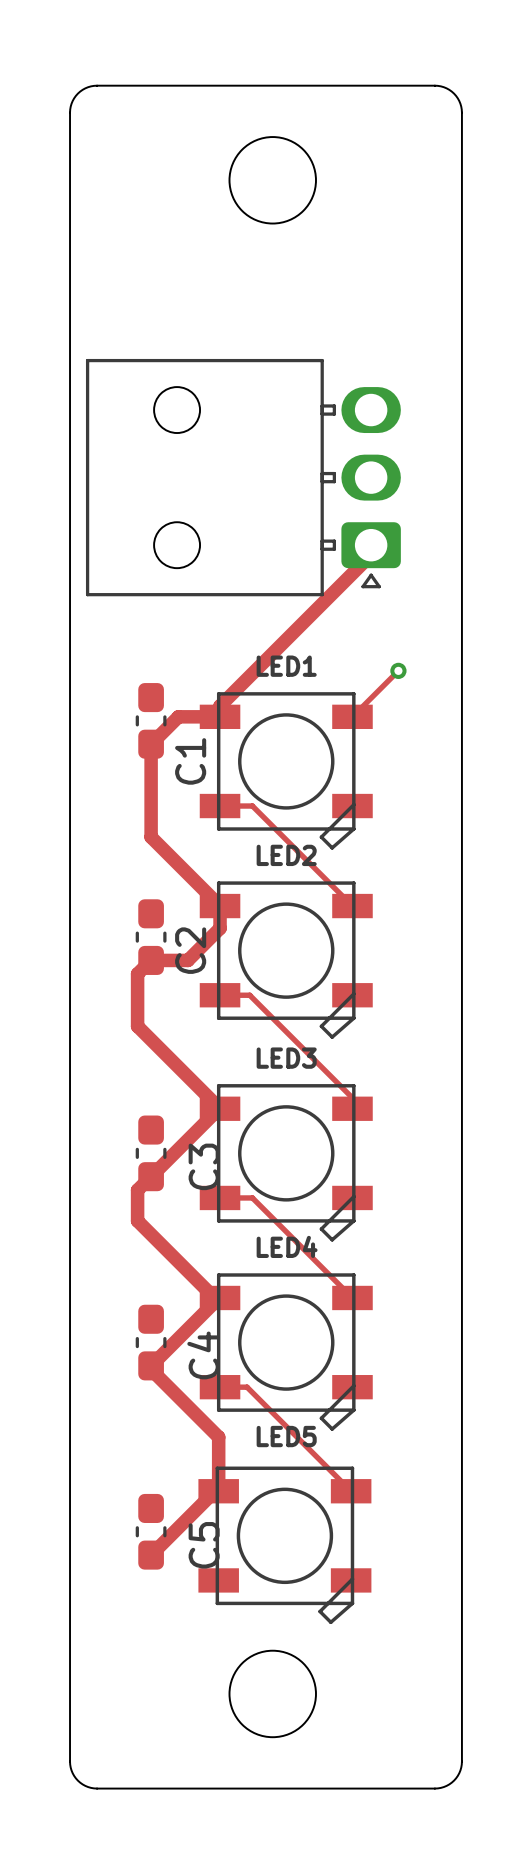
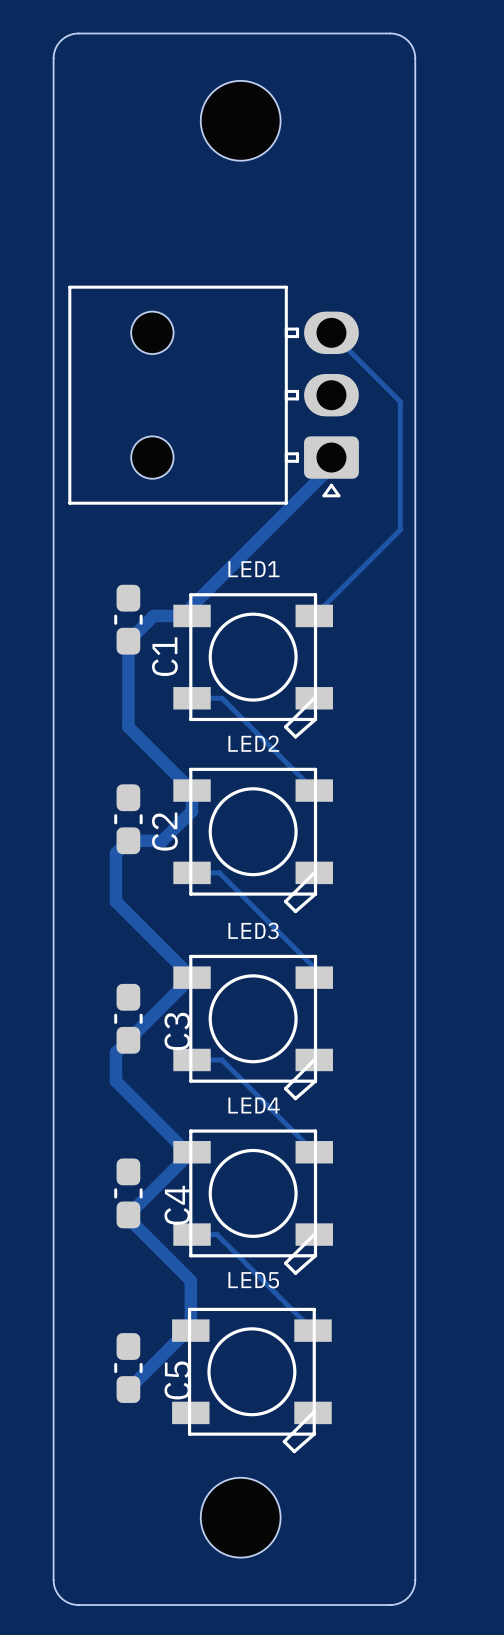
track: none -> (331, 332) (400, 401) (400, 529) (356, 573)
via: (398, 670) -> none

